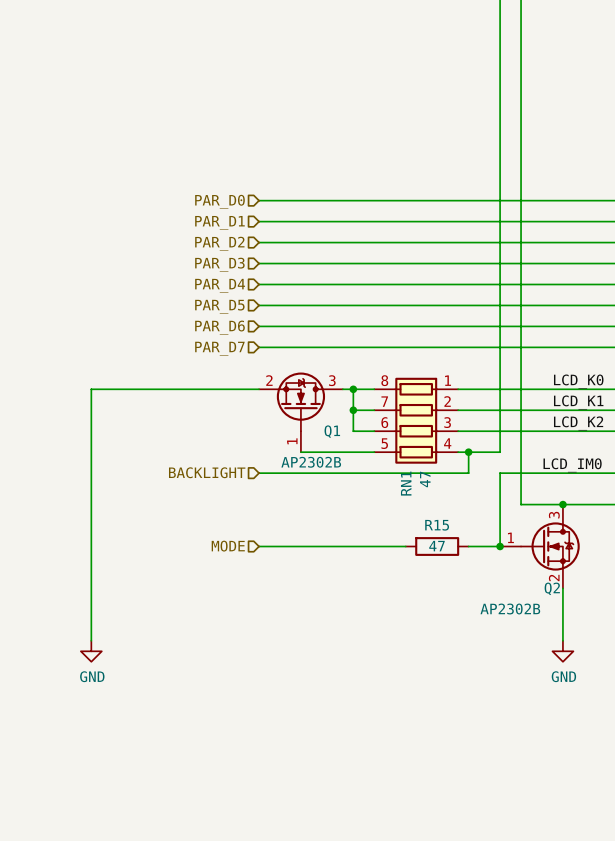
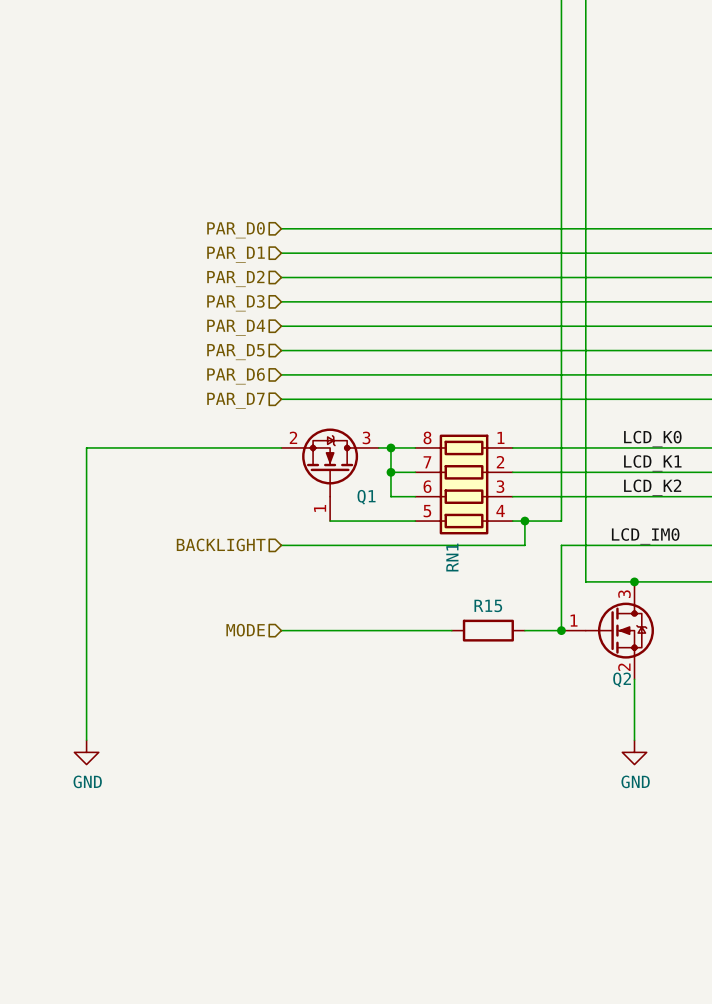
Q1 value: AP2302B (311, 462) -> none
RN1 value: 47 (425, 479) -> none
R15 value: 47 (437, 546) -> none
Q2 value: AP2302B (510, 609) -> none

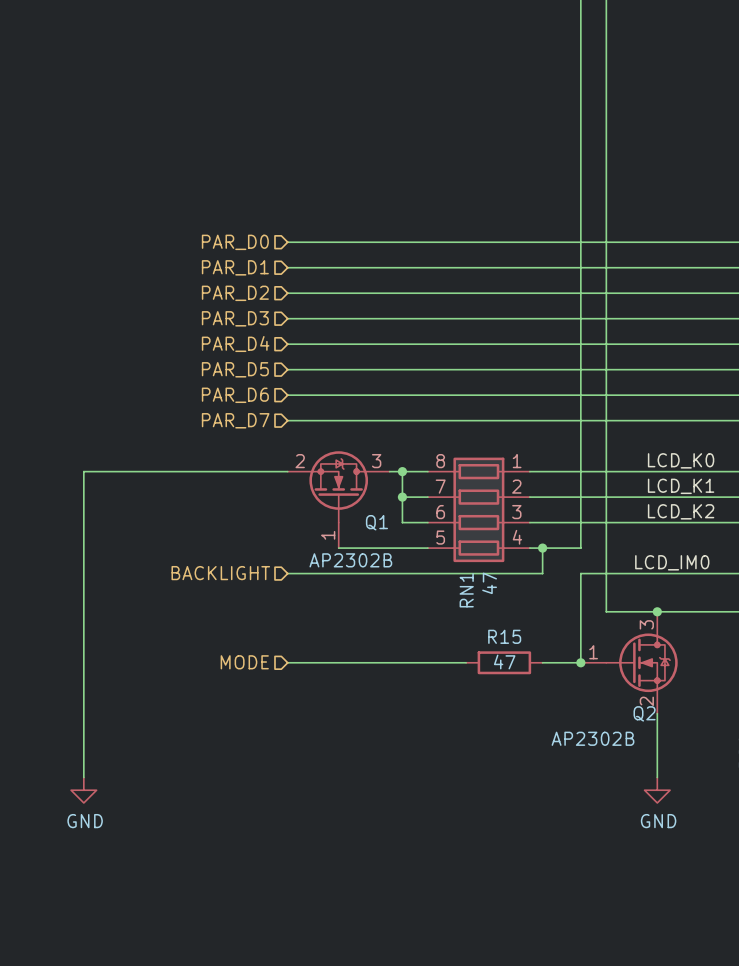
Q1 value: none -> AP2302B (350, 560)
RN1 value: none -> 47 (489, 583)
R15 value: none -> 47 (504, 662)
Q2 value: none -> AP2302B (592, 738)

